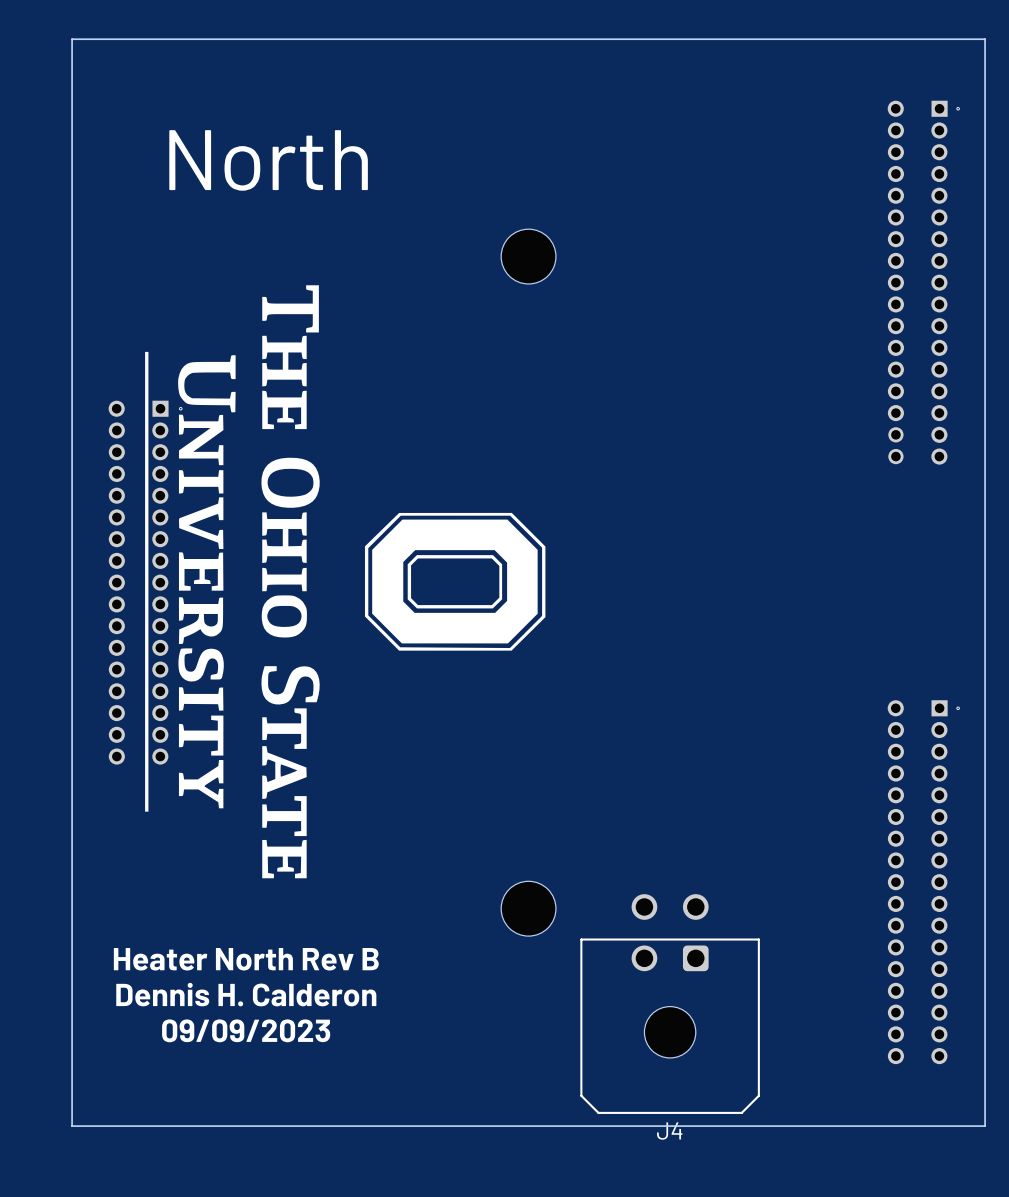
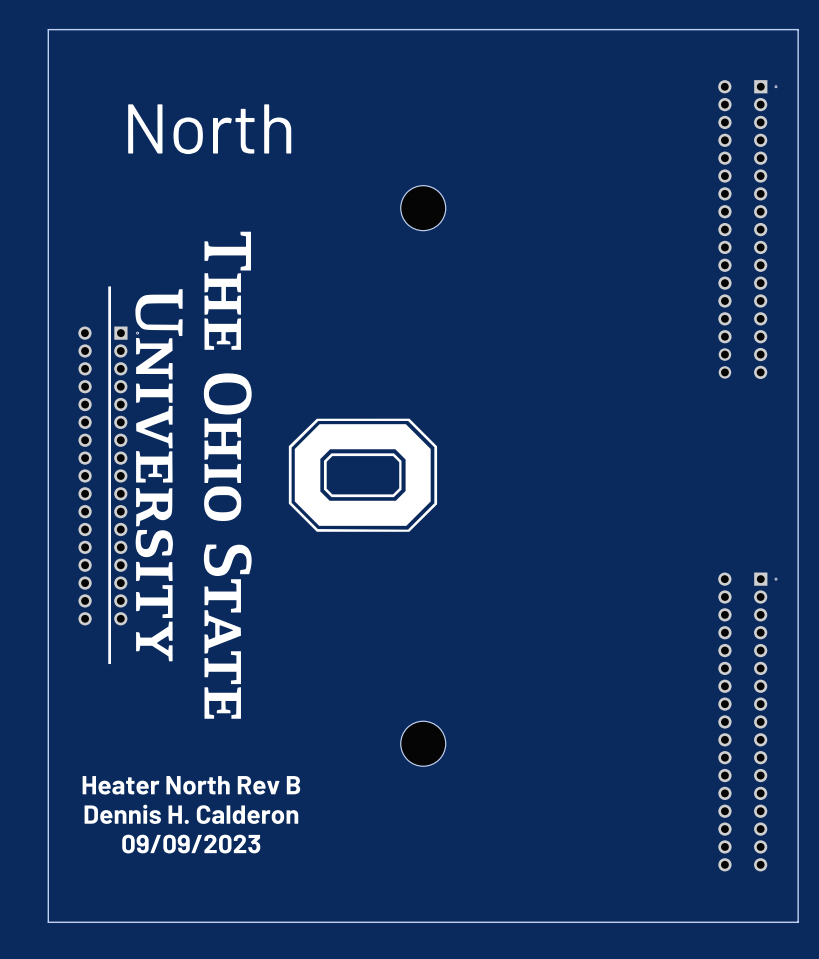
J4: (670, 1004) -> none

